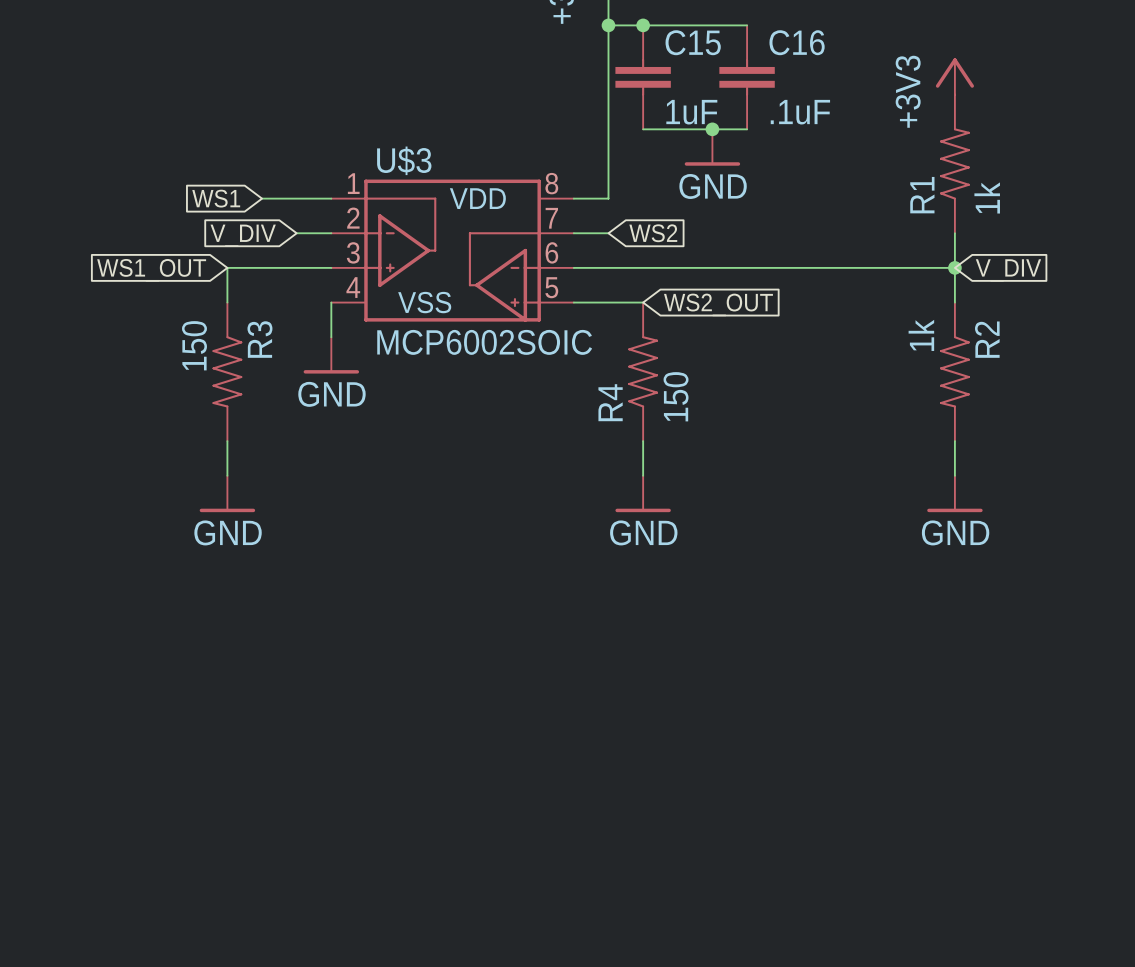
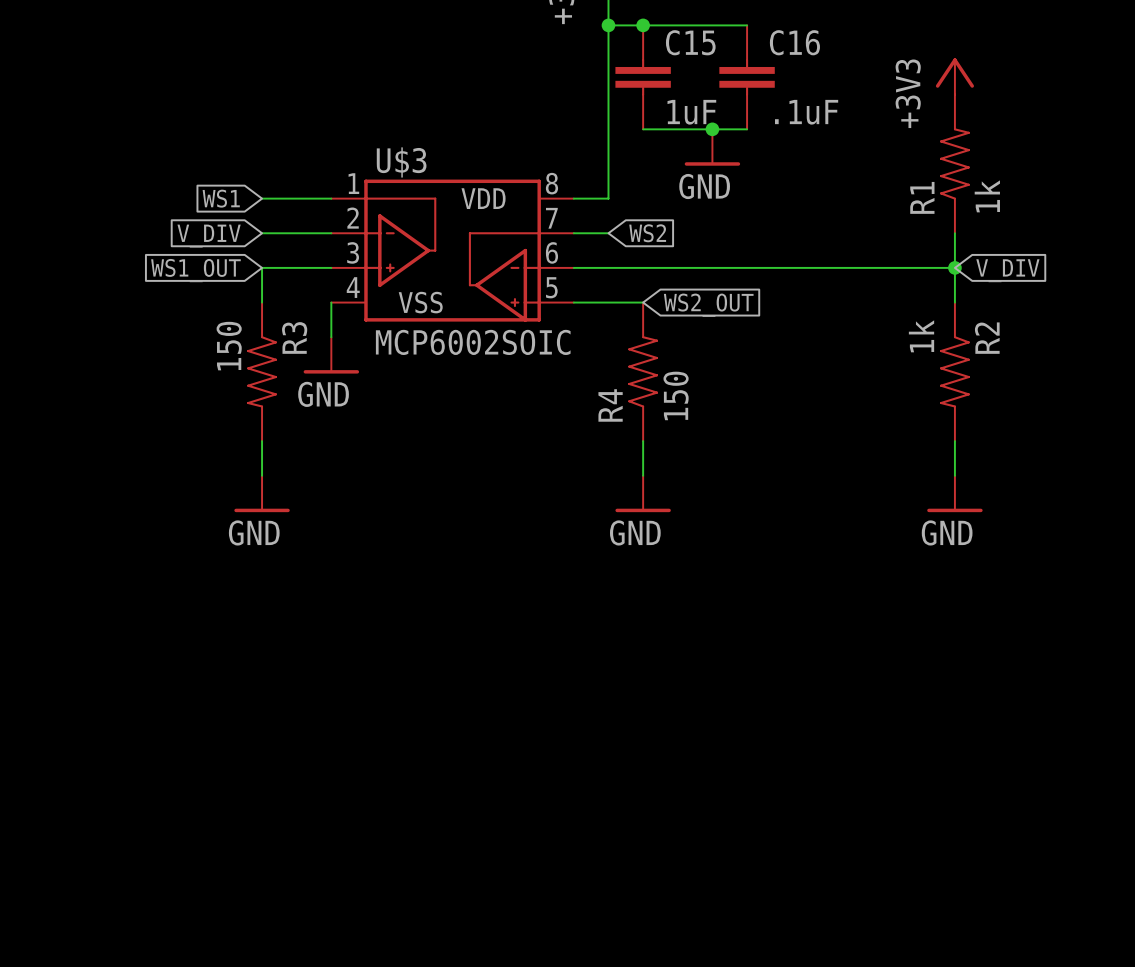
wire: none -> (262, 233) (296, 233)
global label position: V_DIV (243, 235) -> V_DIV (209, 236)
wire: (262, 267) (227, 267) (227, 302) -> (262, 267) (262, 302)
global label position: WS1_OUT (151, 270) -> WS1_OUT (195, 270)
R3 position: (227, 371) -> (262, 371)
wire: (227, 441) (227, 475) -> (262, 441) (262, 475)
power symbol position: GND (227, 493) -> GND (262, 493)

